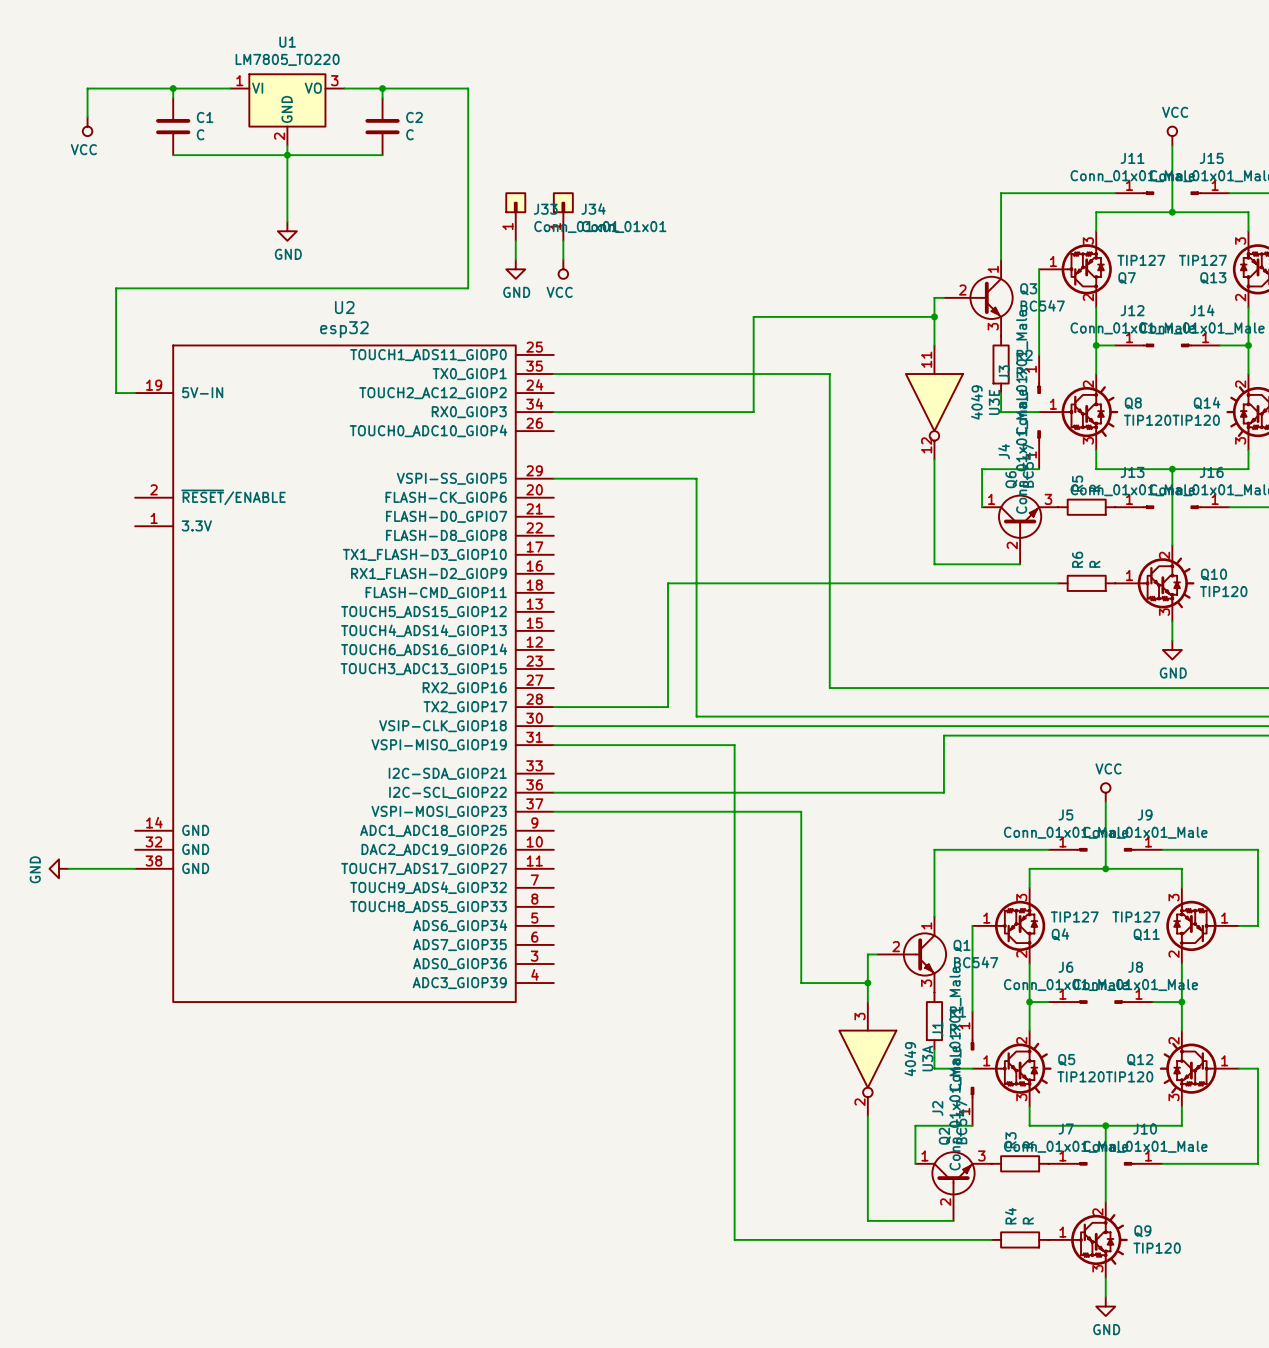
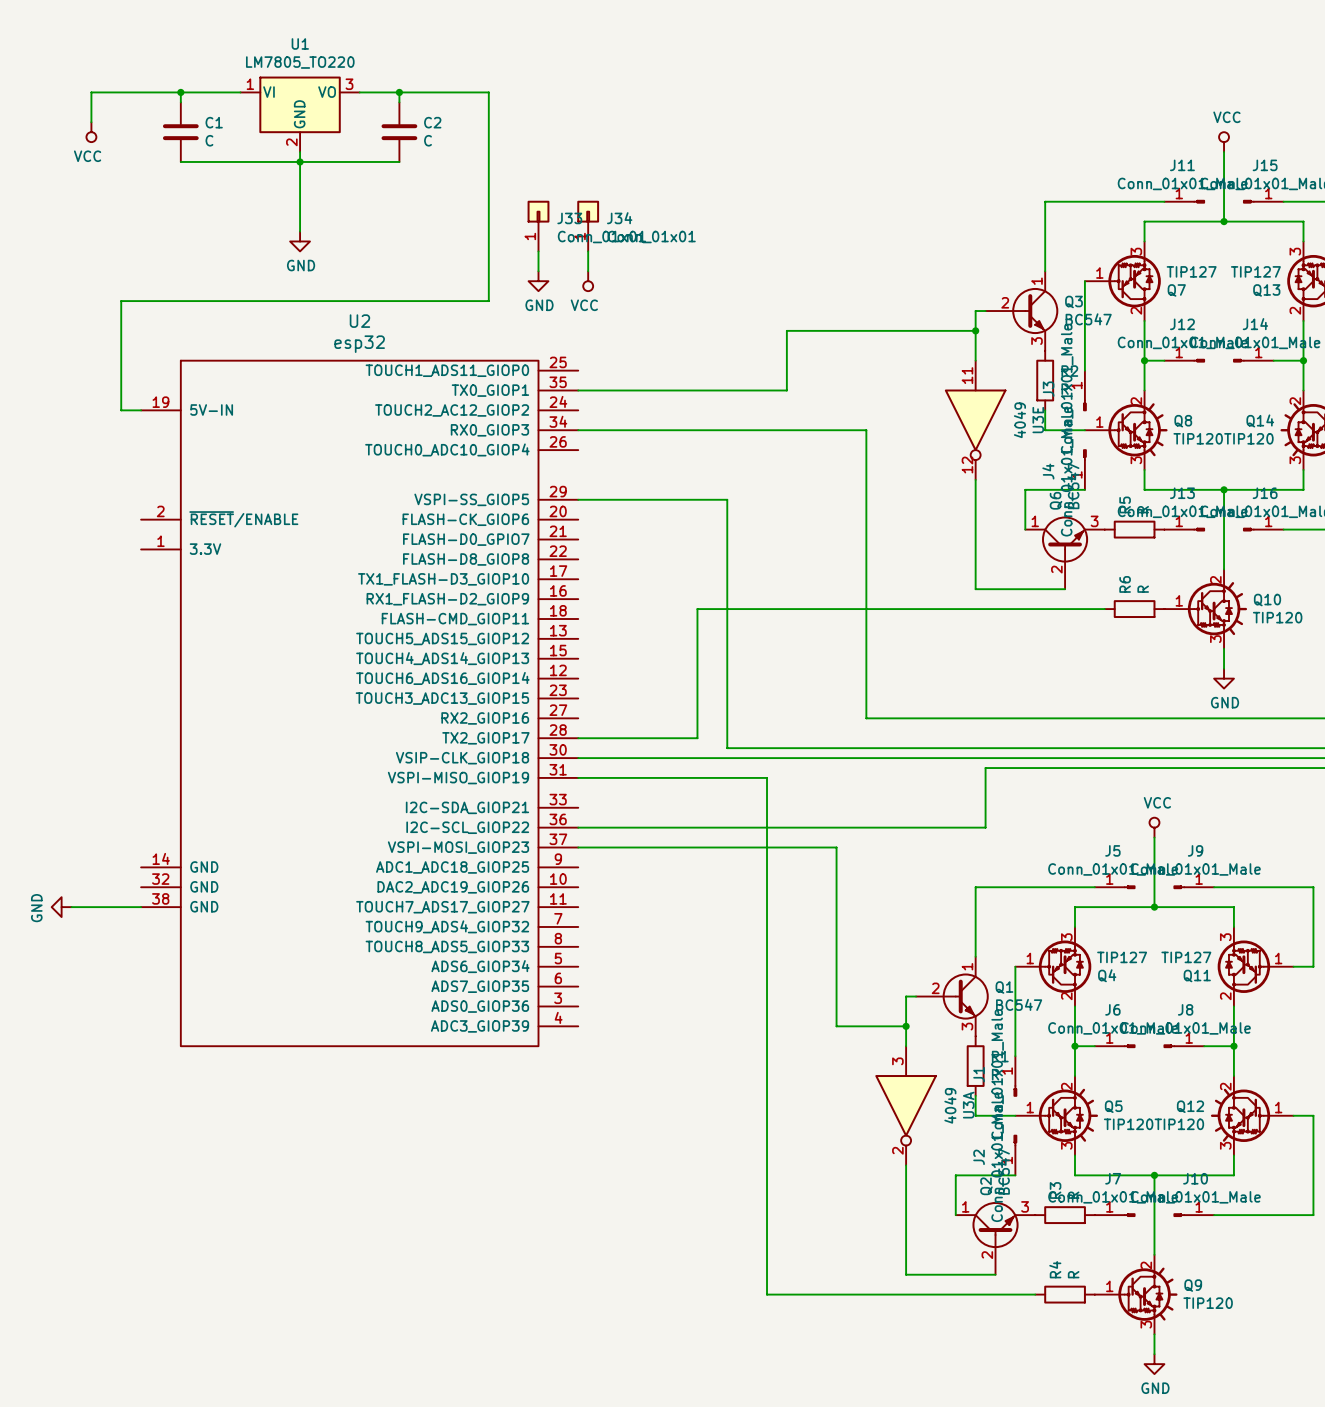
wire: (753, 412) (753, 374) (829, 374) (829, 412) -> (786, 430) (866, 430)

